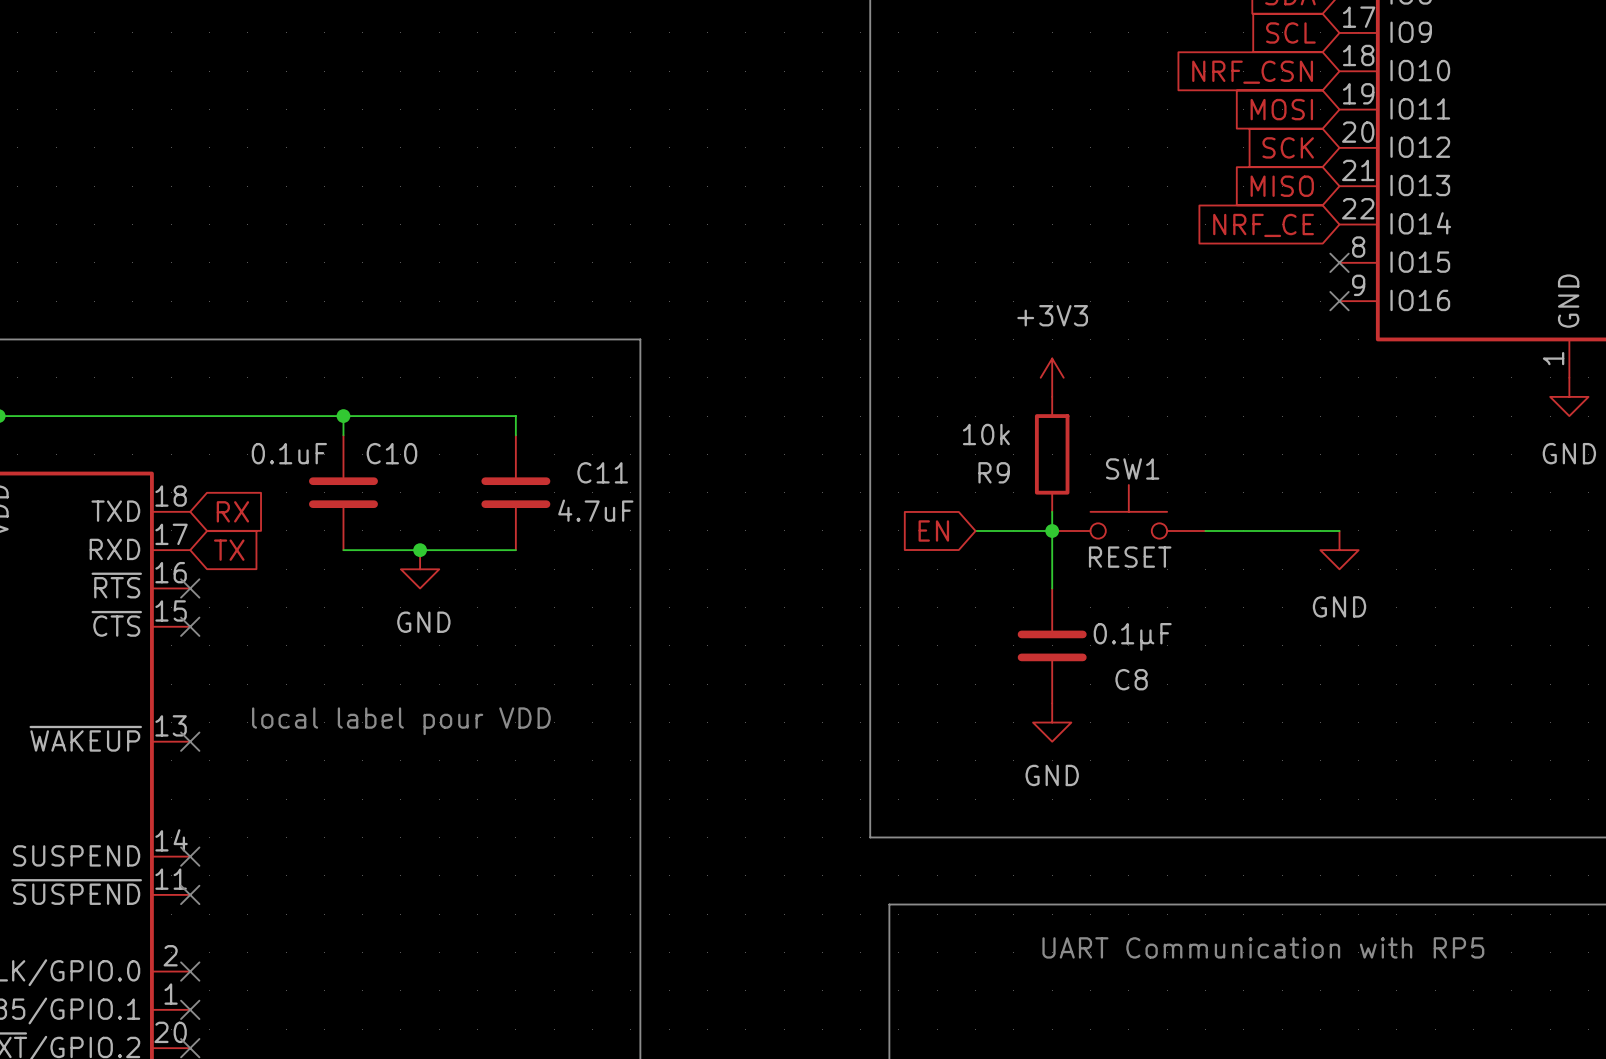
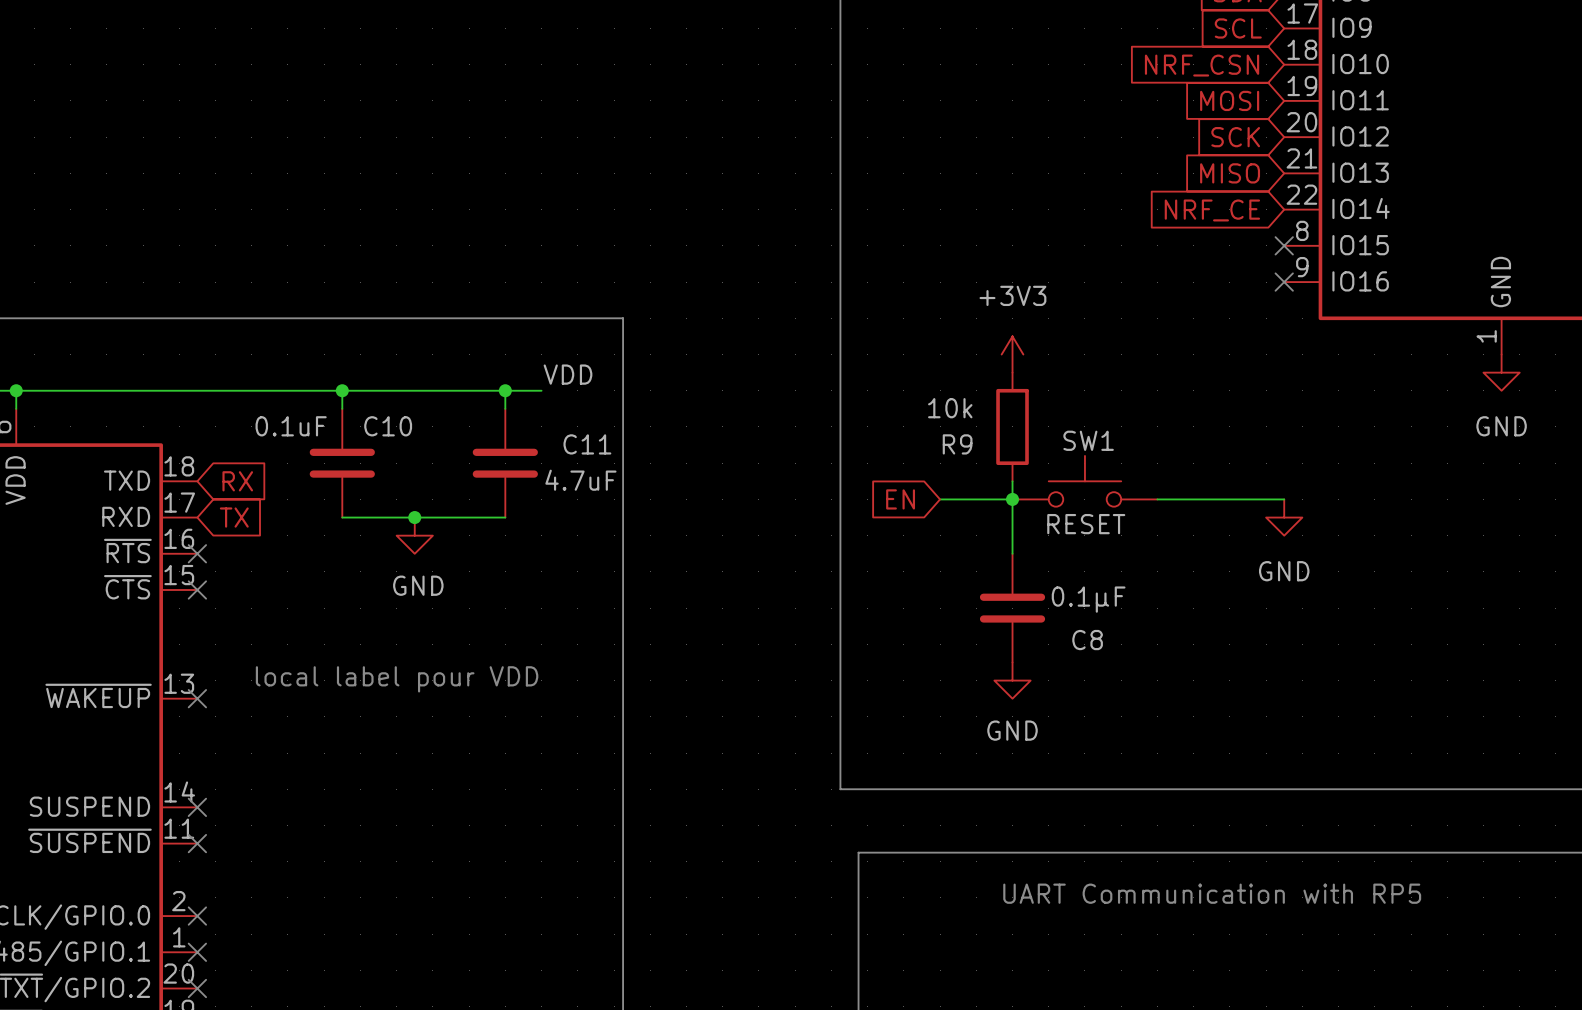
label: none -> VDD (568, 374)
wire: none -> (505, 390) (541, 390)
junction: none -> (505, 390)

